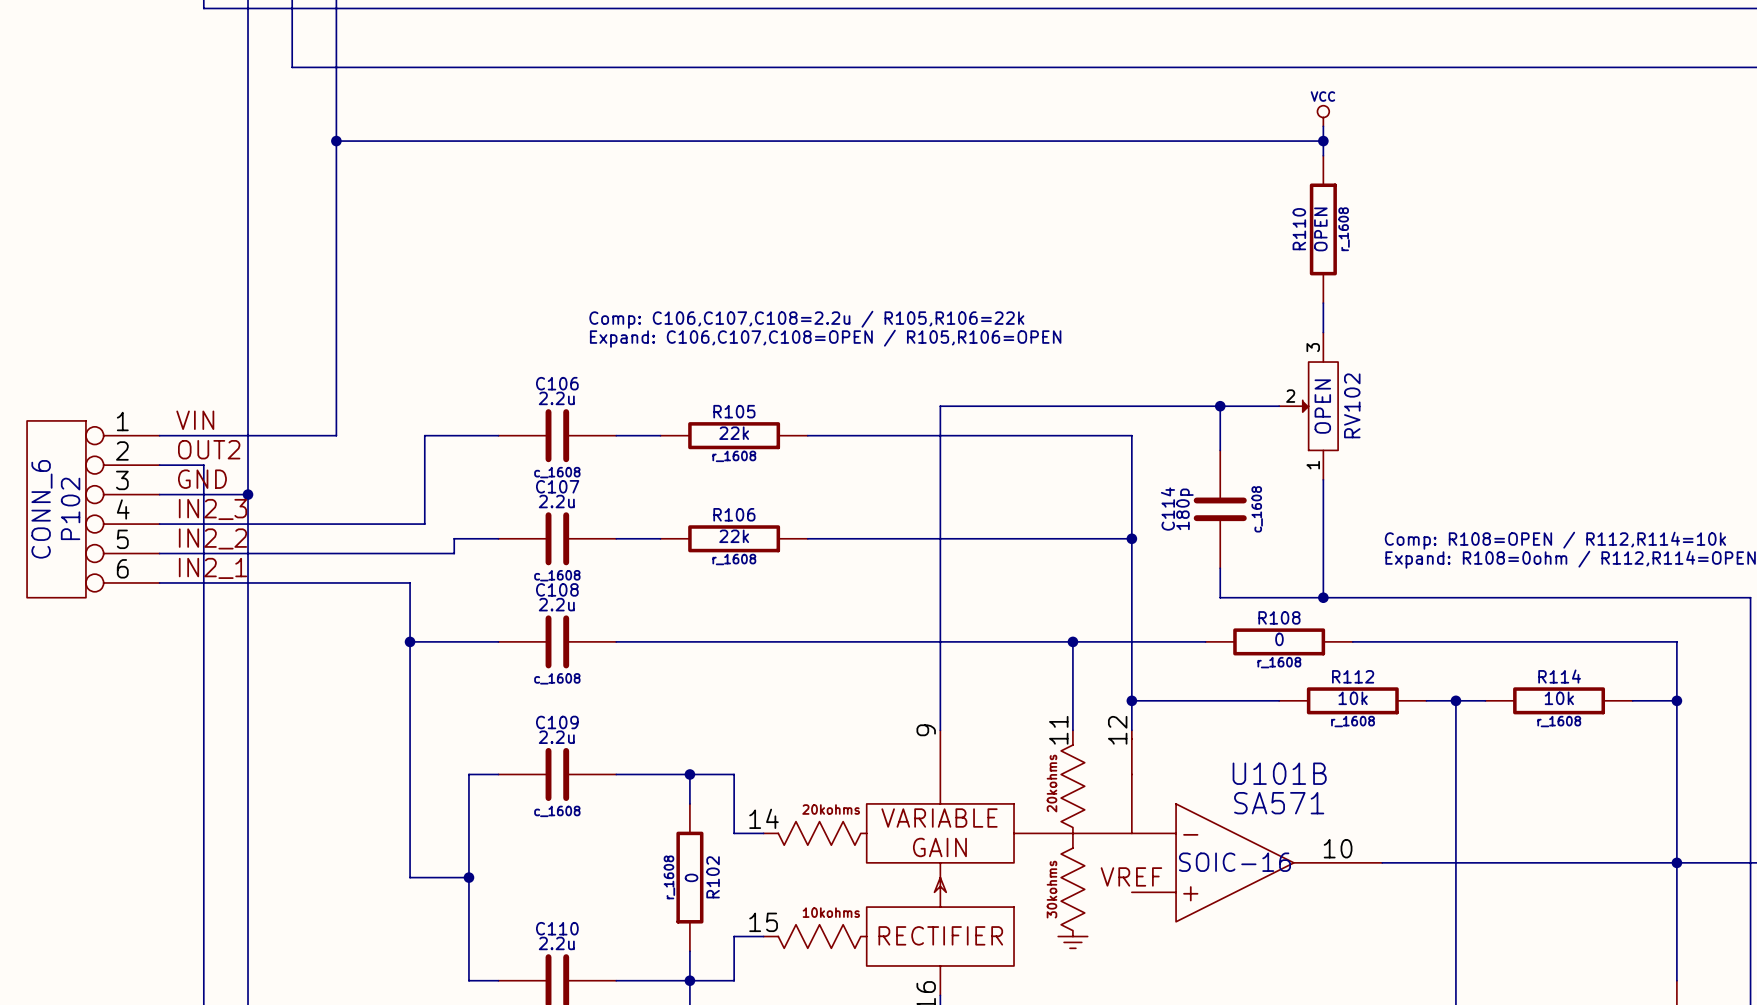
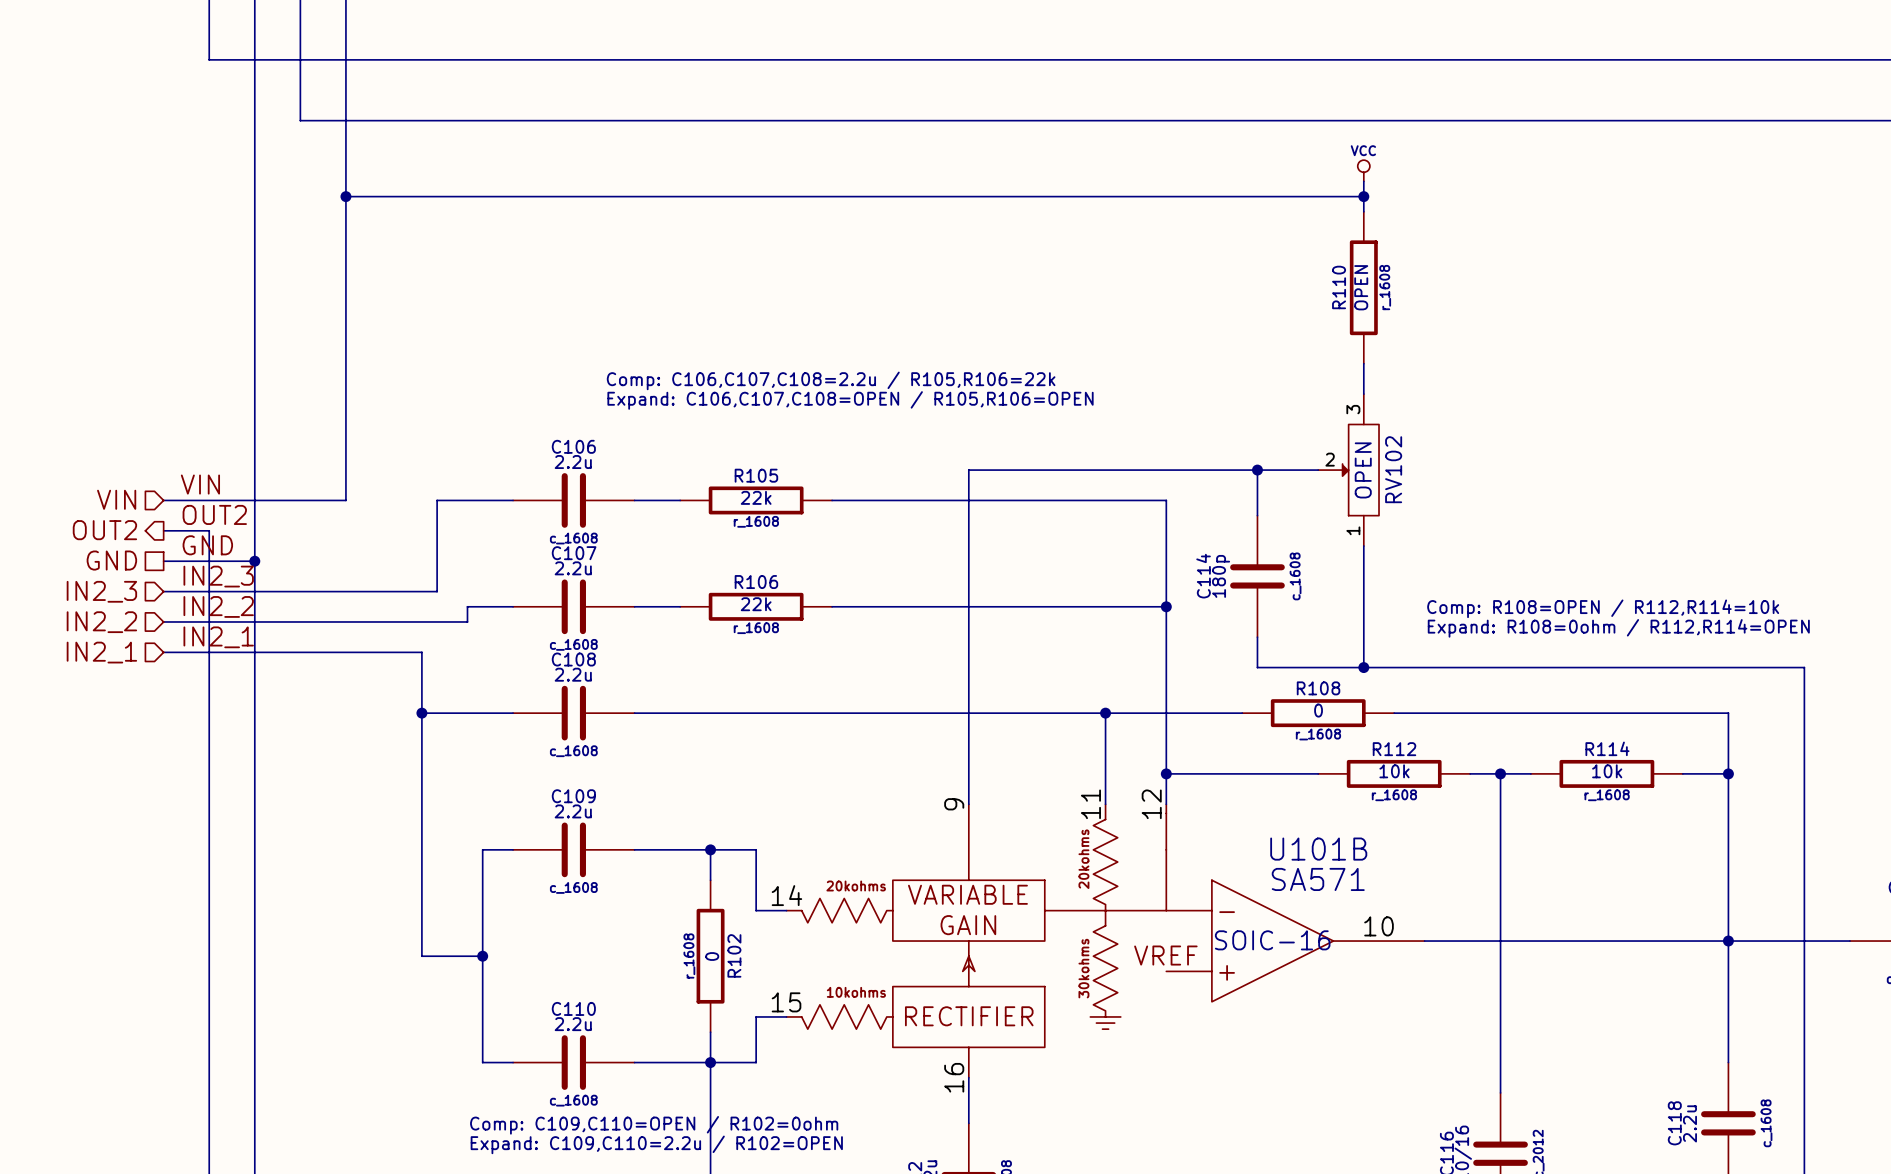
hierarchical label: none -> VIN (116, 499)
hierarchical label: none -> OUT2 (104, 530)
hierarchical label: none -> GND (111, 560)
P102: CONN_6 (93, 509) -> none
hierarchical label: none -> IN2_3 (101, 591)
hierarchical label: none -> IN2_2 (101, 622)
hierarchical label: none -> IN2_1 (101, 652)

